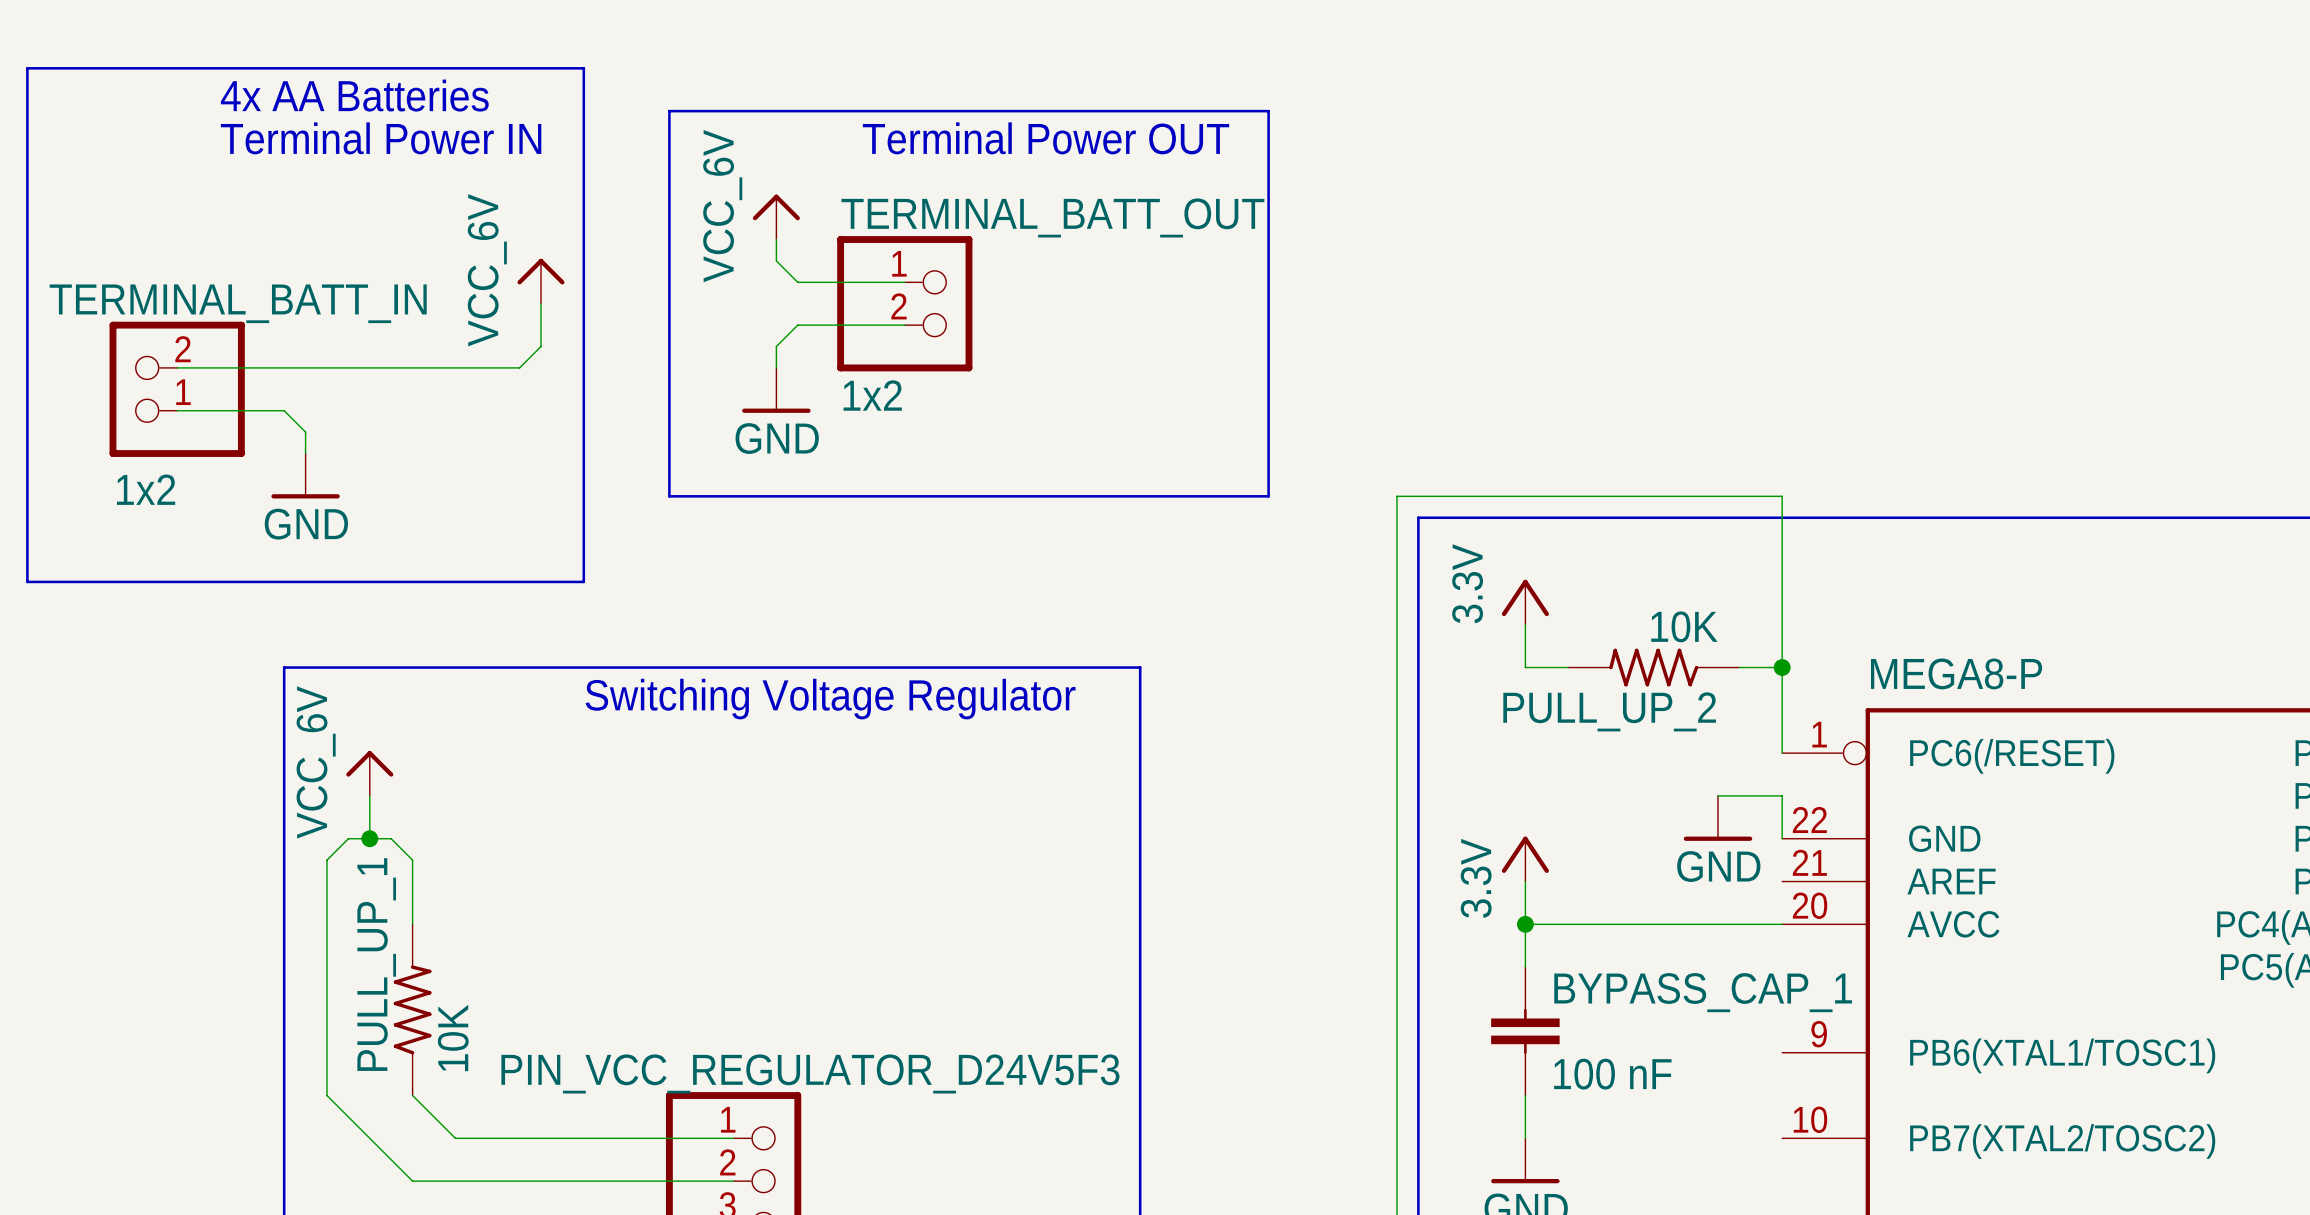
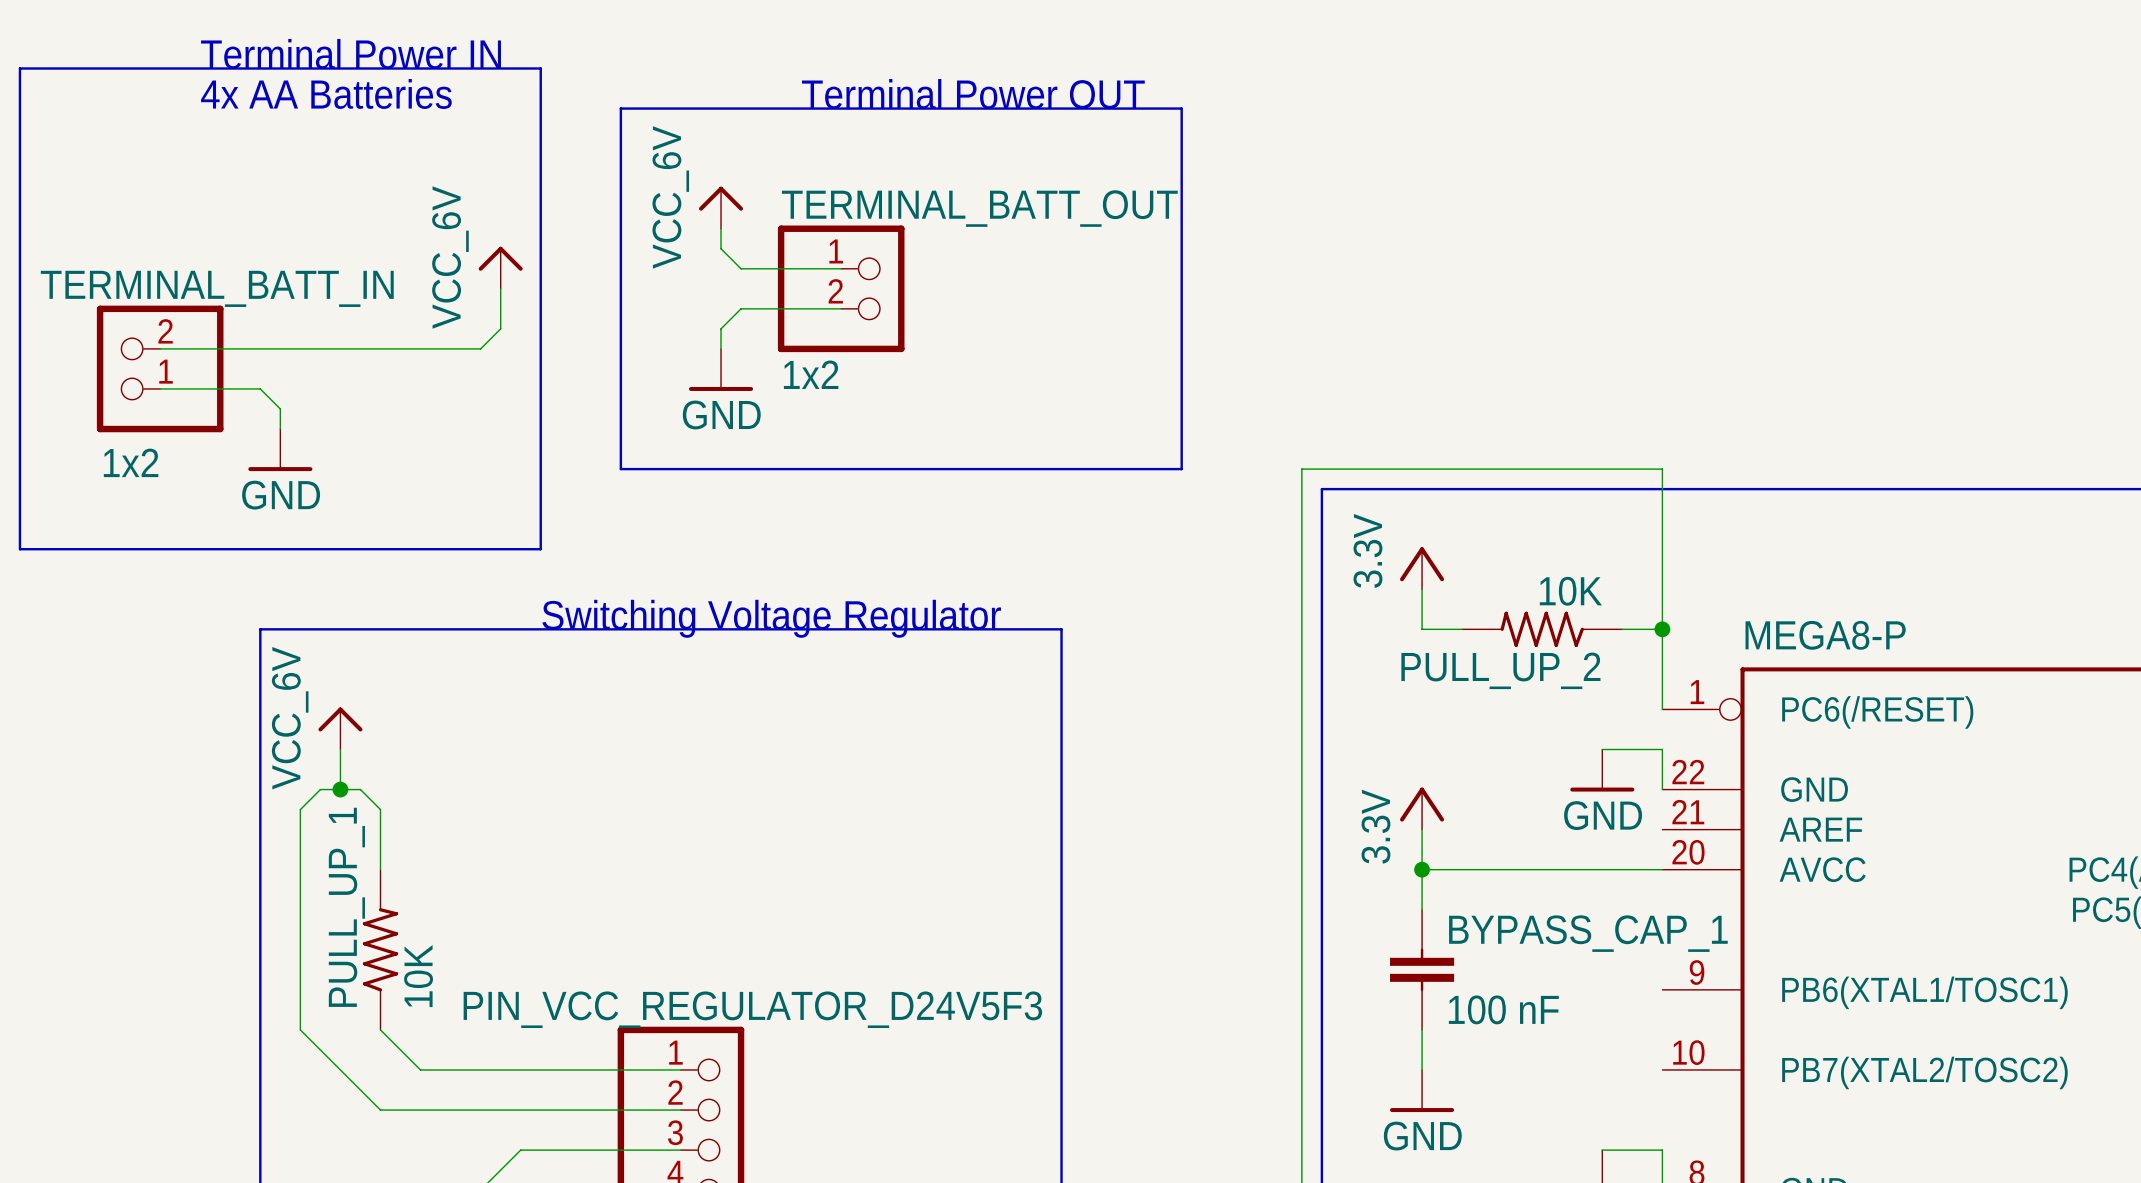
text position: Terminal Power IN (381, 138) -> Terminal Power IN (351, 53)
text position: Terminal Power OUT (1046, 138) -> Terminal Power OUT (973, 93)
text position: Switching Voltage Regulator (830, 699) -> Switching Voltage Regulator (771, 618)

